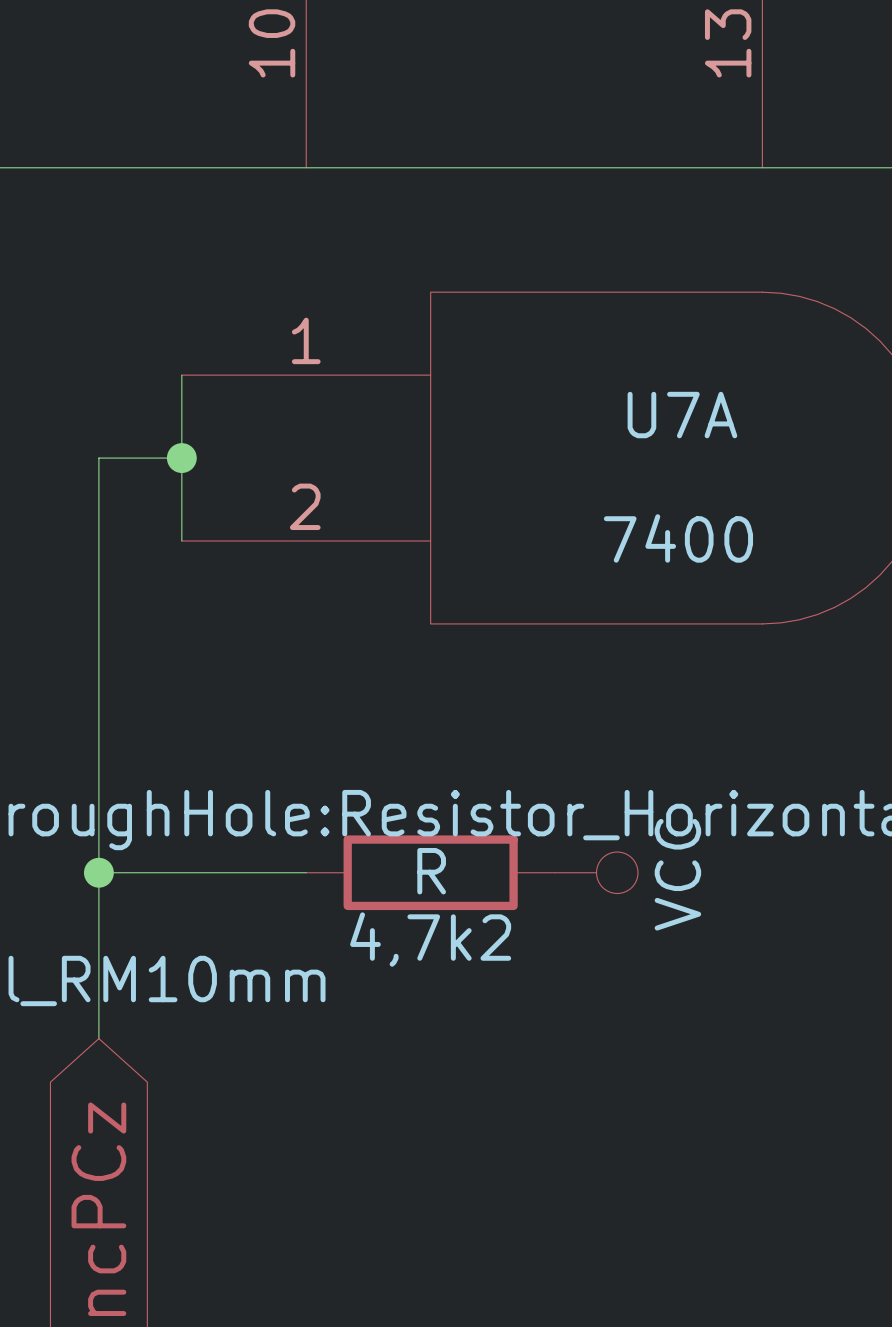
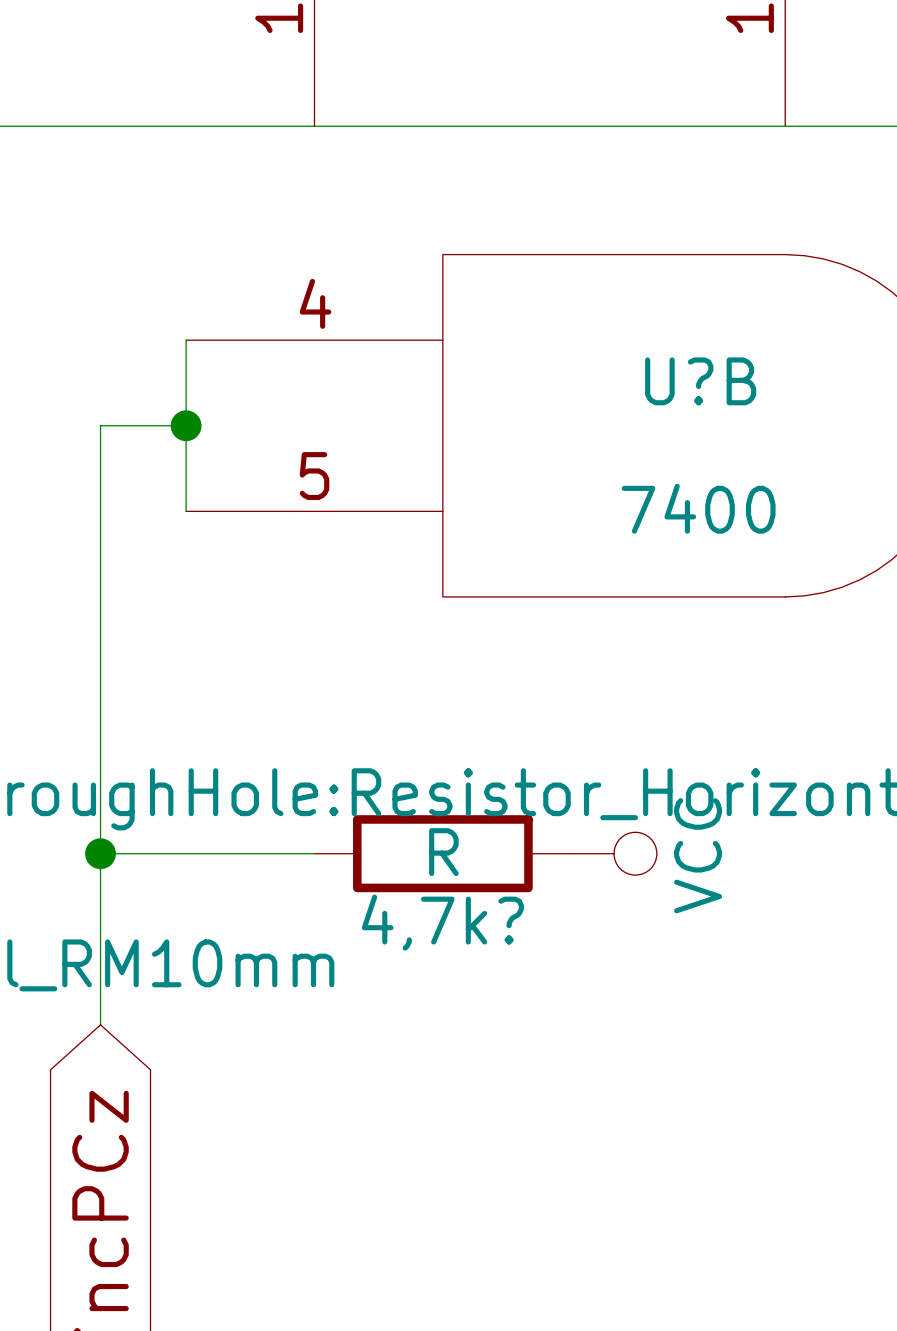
U7A pin number: 1 (306, 340) -> 4 (315, 303)
U7A name: U7A (682, 415) -> U?B (700, 381)
U7A pin number: 2 (305, 506) -> 5 (314, 476)
4,7k2 name: 4,7k2 (430, 939) -> 4,7k? (442, 922)

